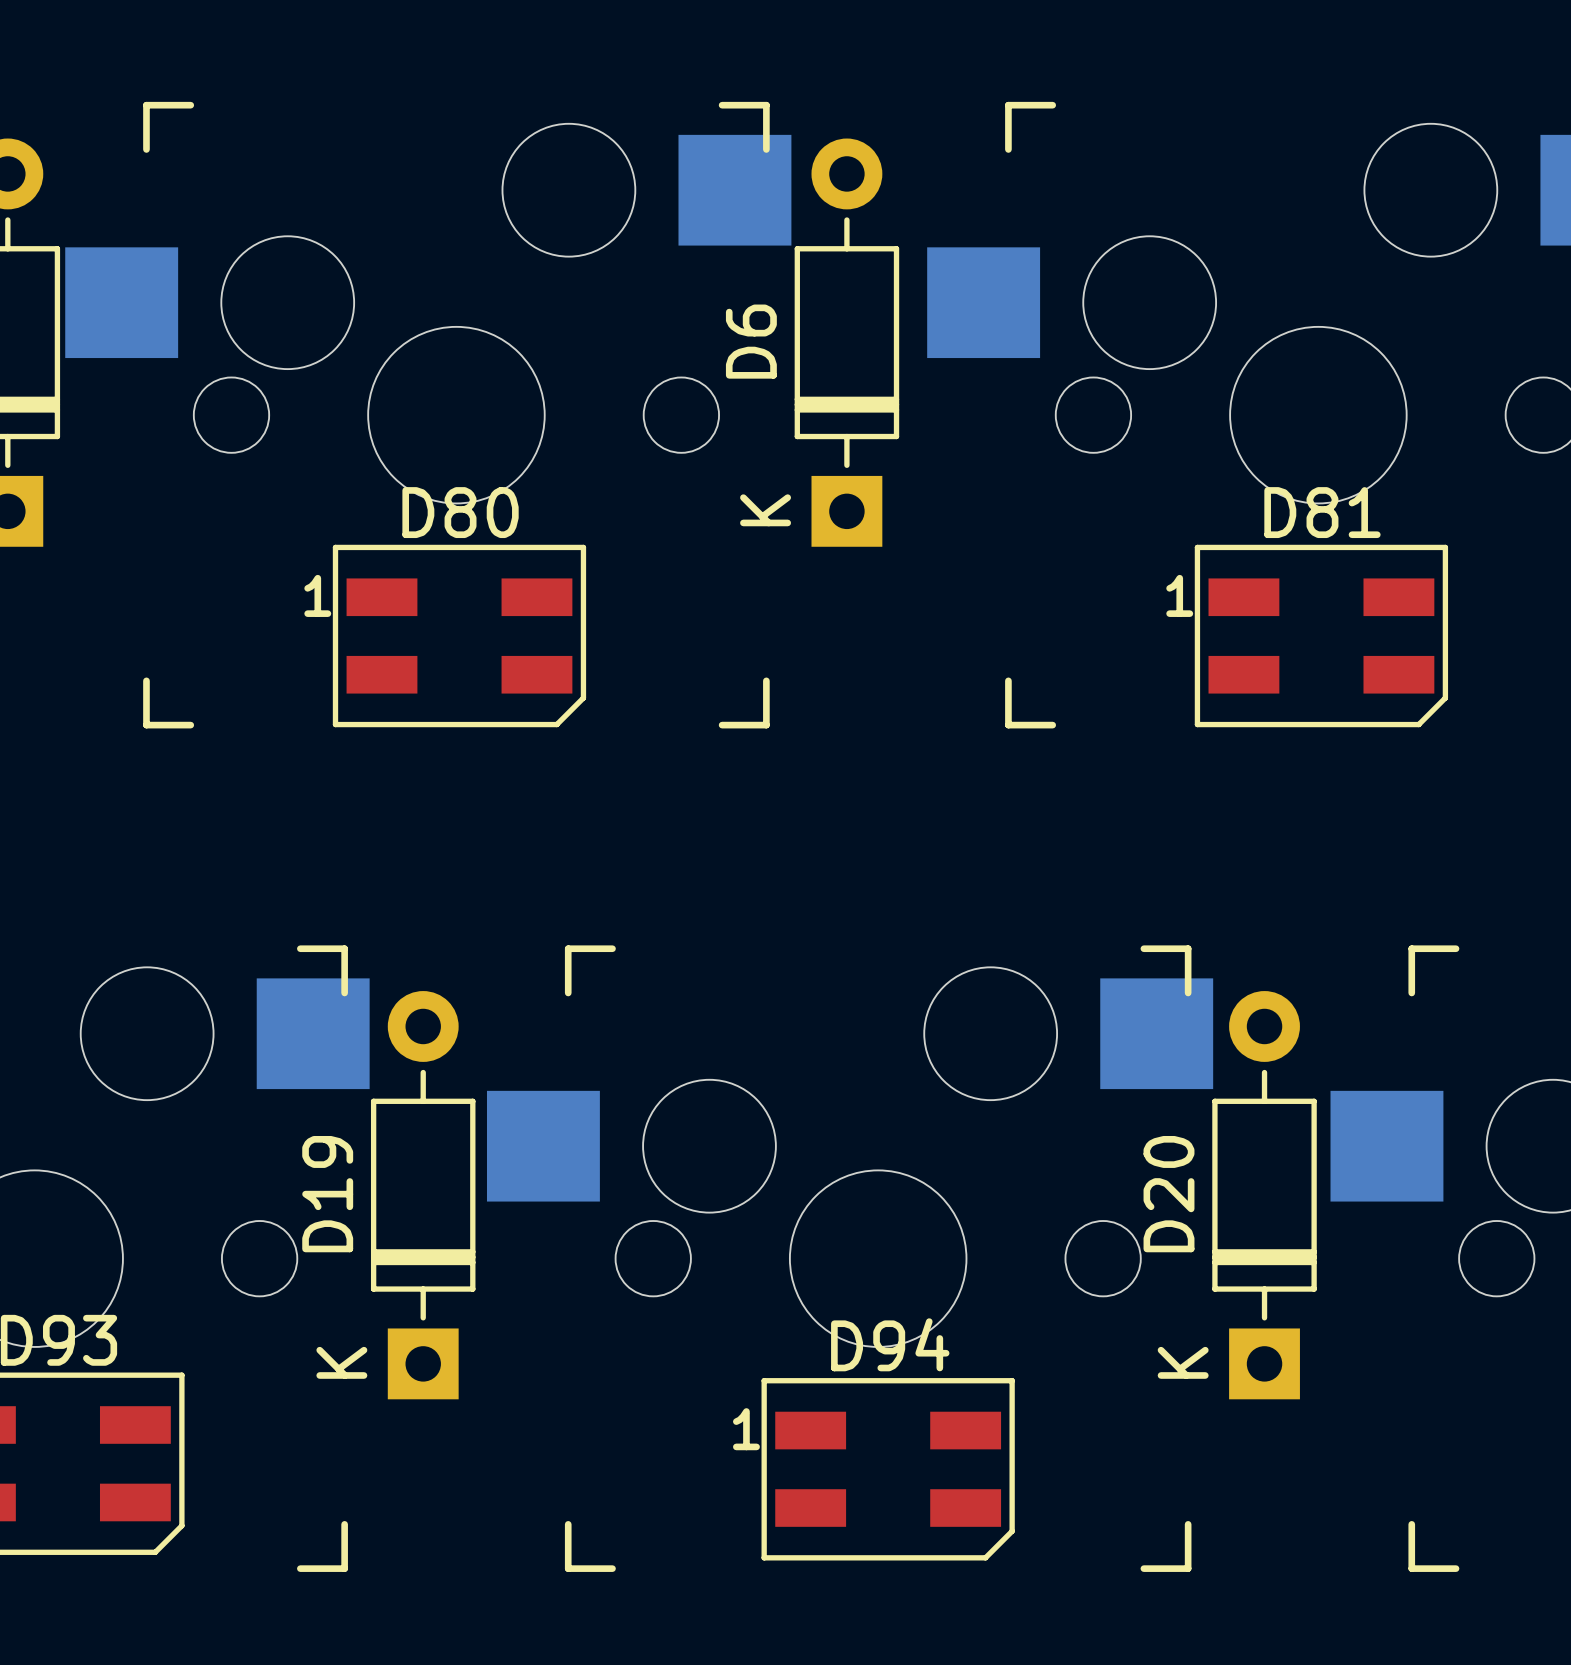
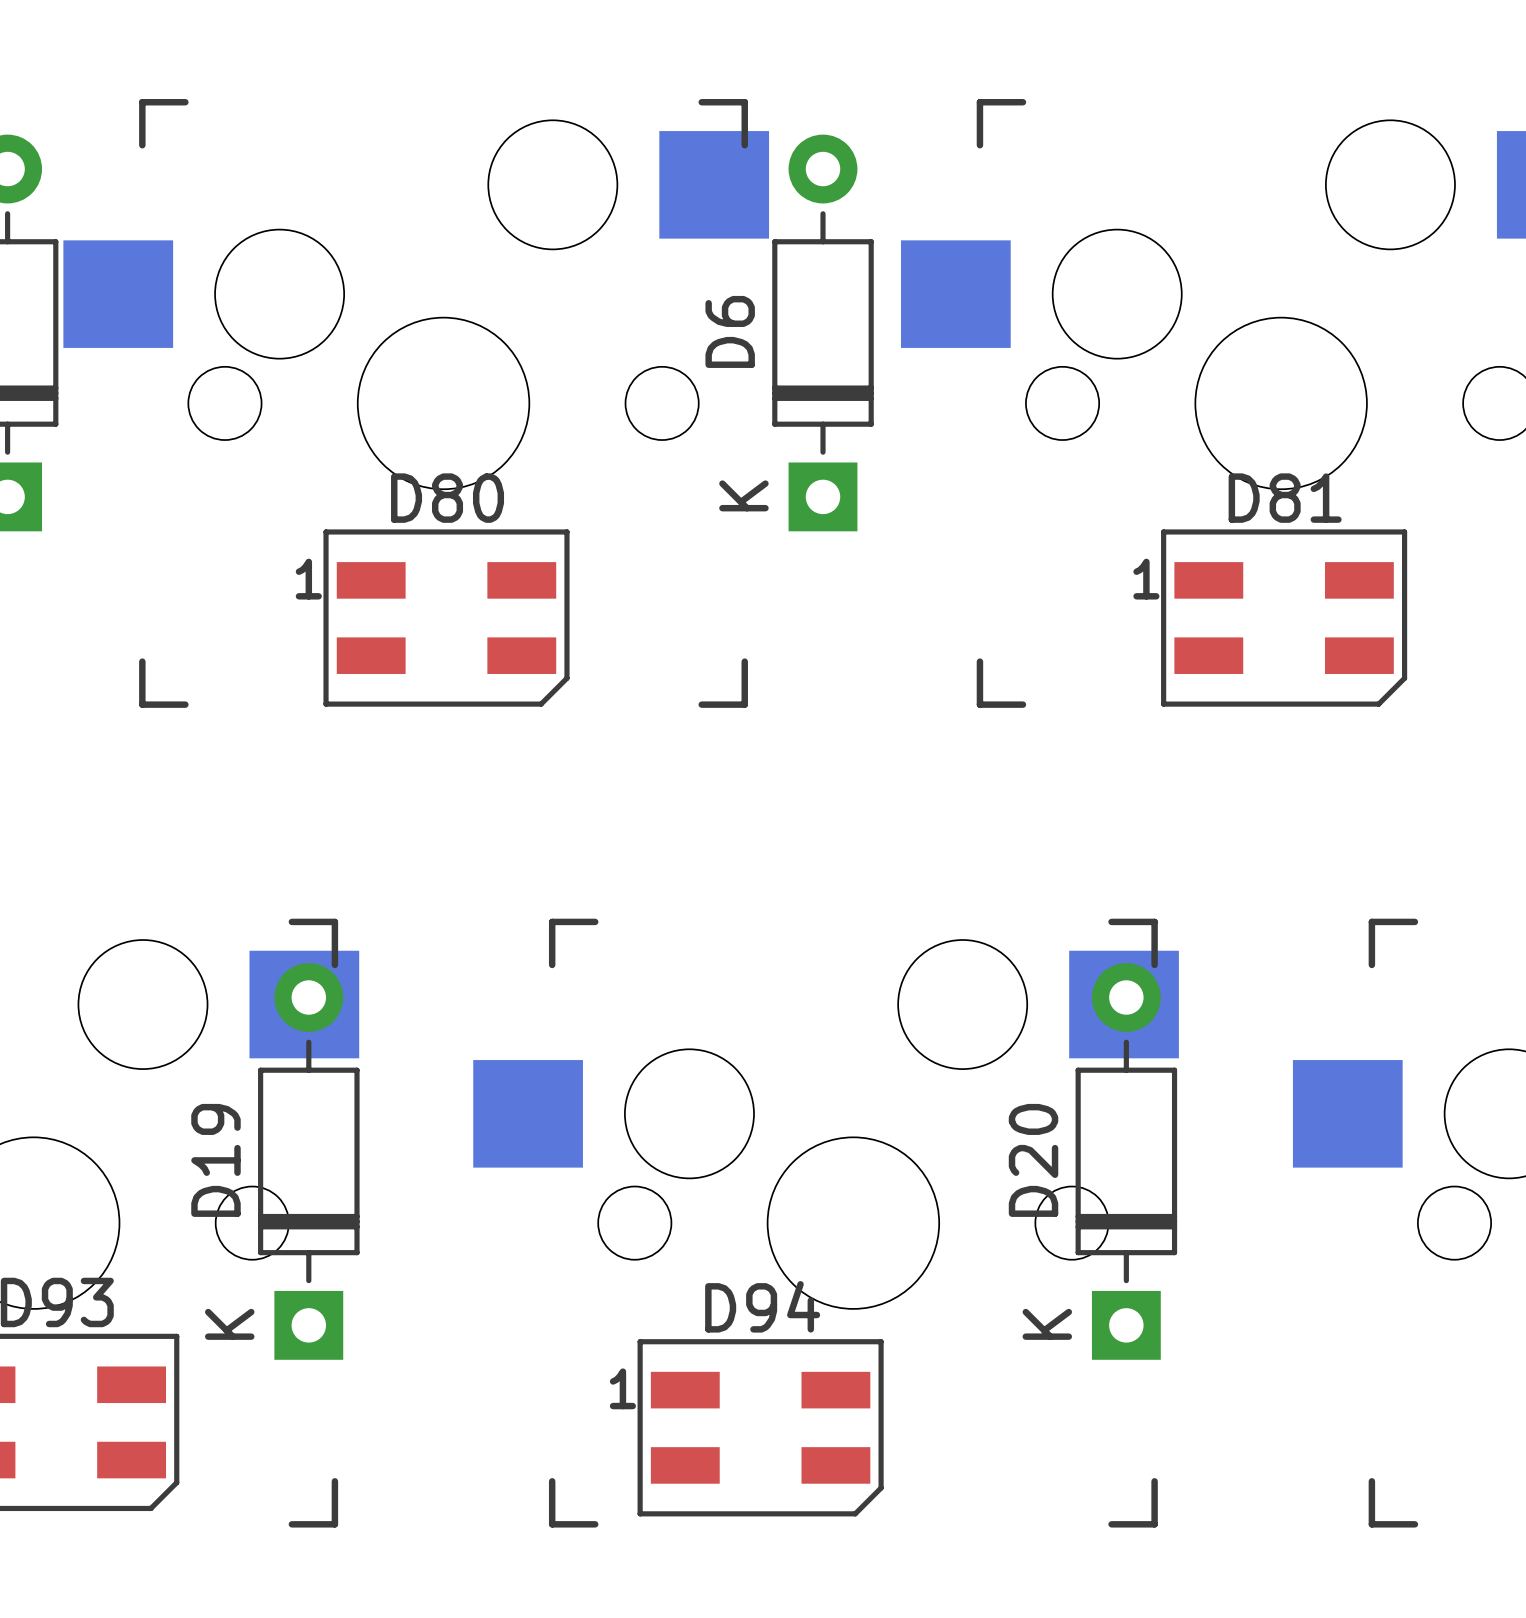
D19 position: (423, 1195) -> (308, 1161)
D20 position: (1264, 1195) -> (1126, 1161)
D94 position: (888, 1469) -> (760, 1427)

